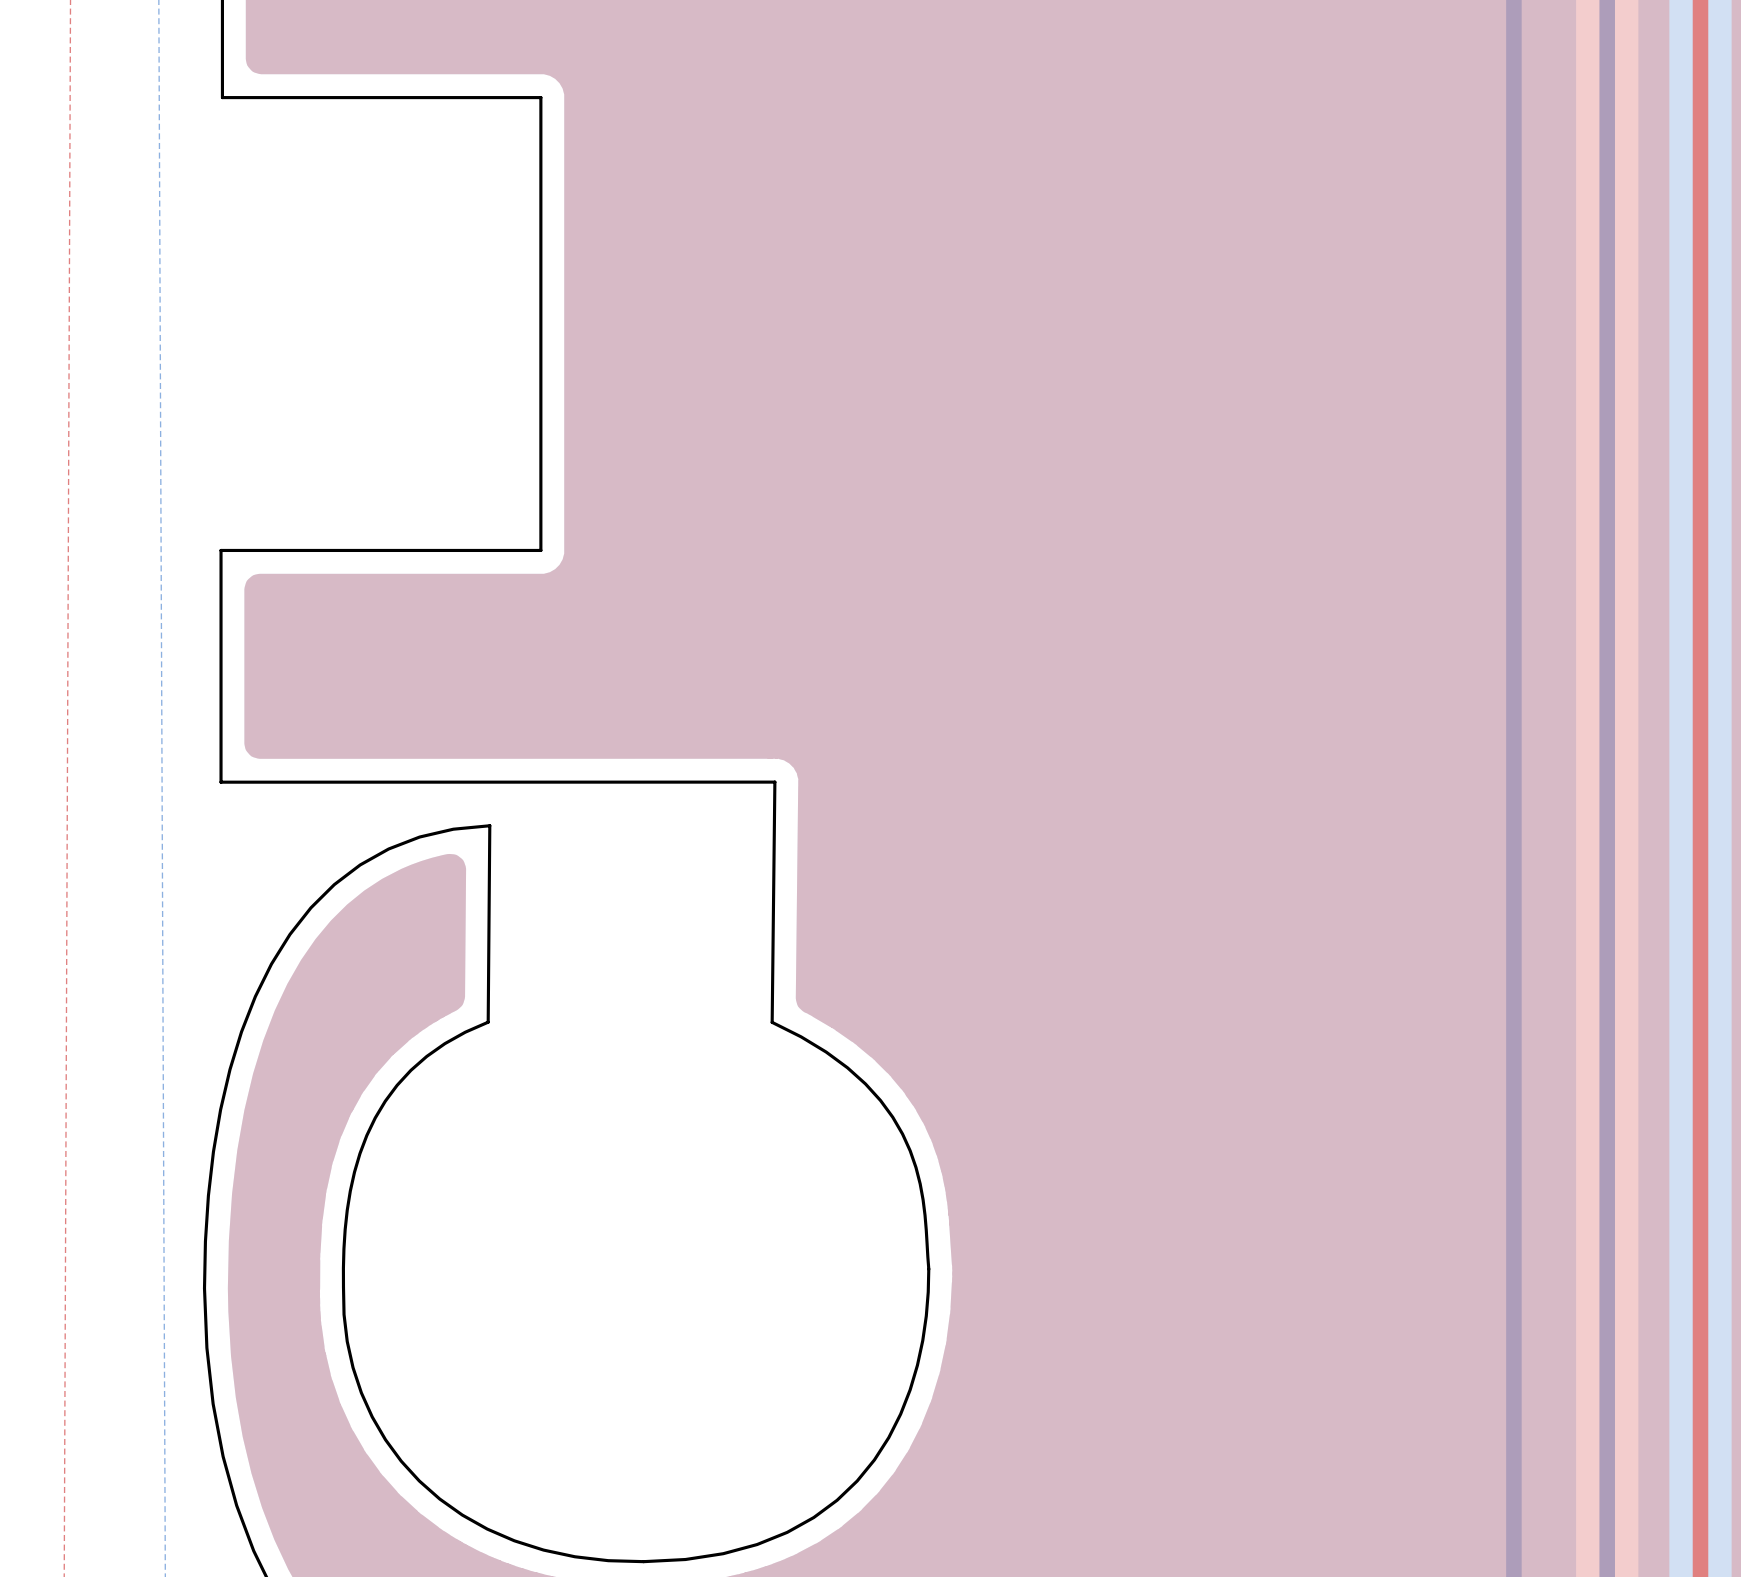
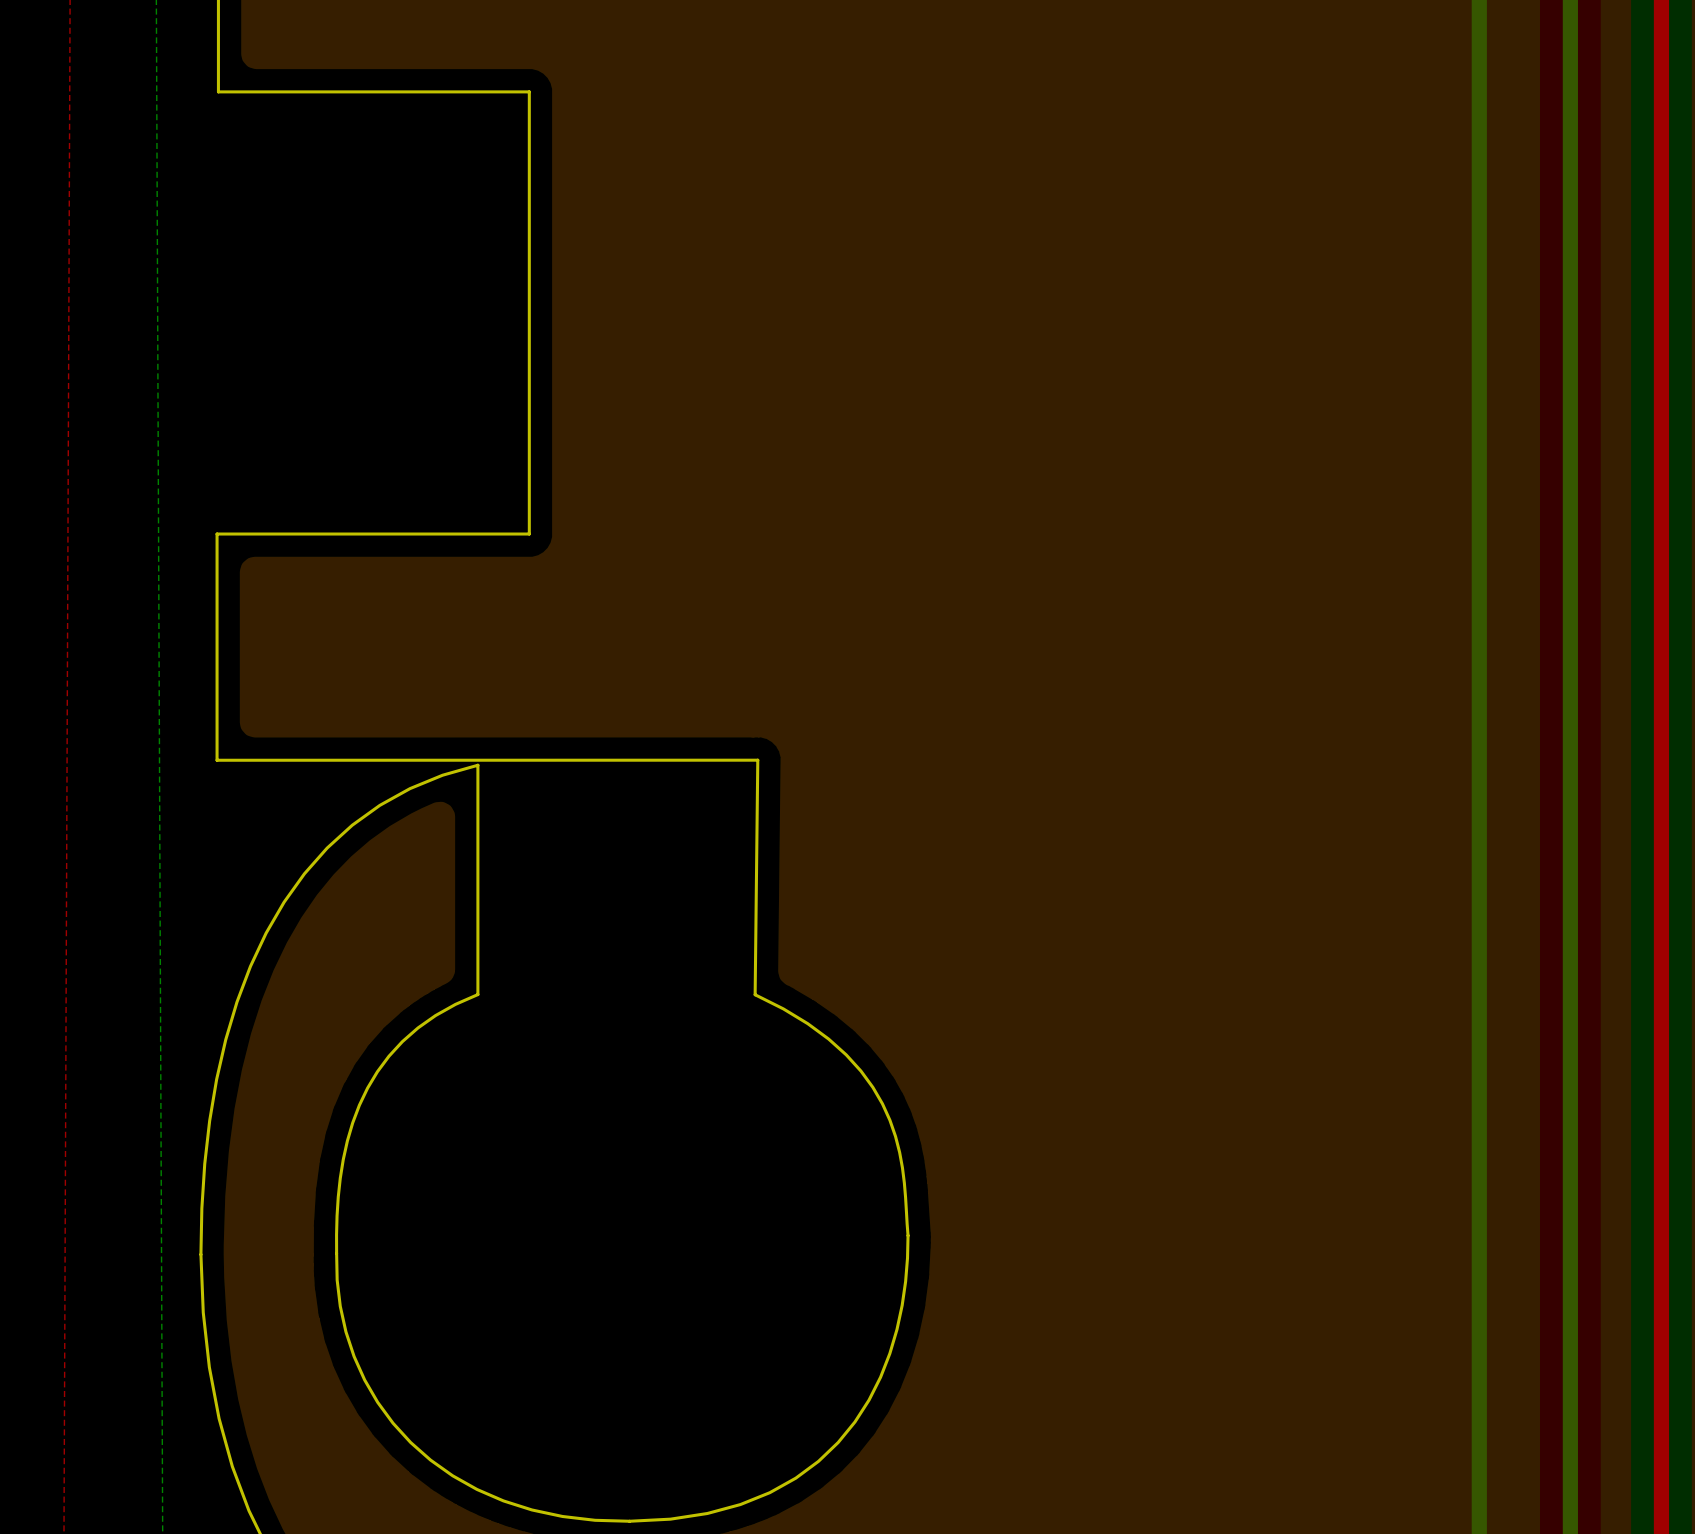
board edge: (488, 1022) (489, 825) (453, 829) (419, 837) (388, 849) (360, 864) (334, 884) (310, 907) (290, 934) (271, 964) (255, 996) (241, 1031) (229, 1069) (213, 1151) (208, 1195) (204, 1288) -> (477, 994) (477, 765) (442, 775) (409, 788) (379, 805) (352, 825) (327, 848) (304, 873) (284, 902) (266, 933) (237, 1002) (216, 1079) (204, 1163) (200, 1254)

